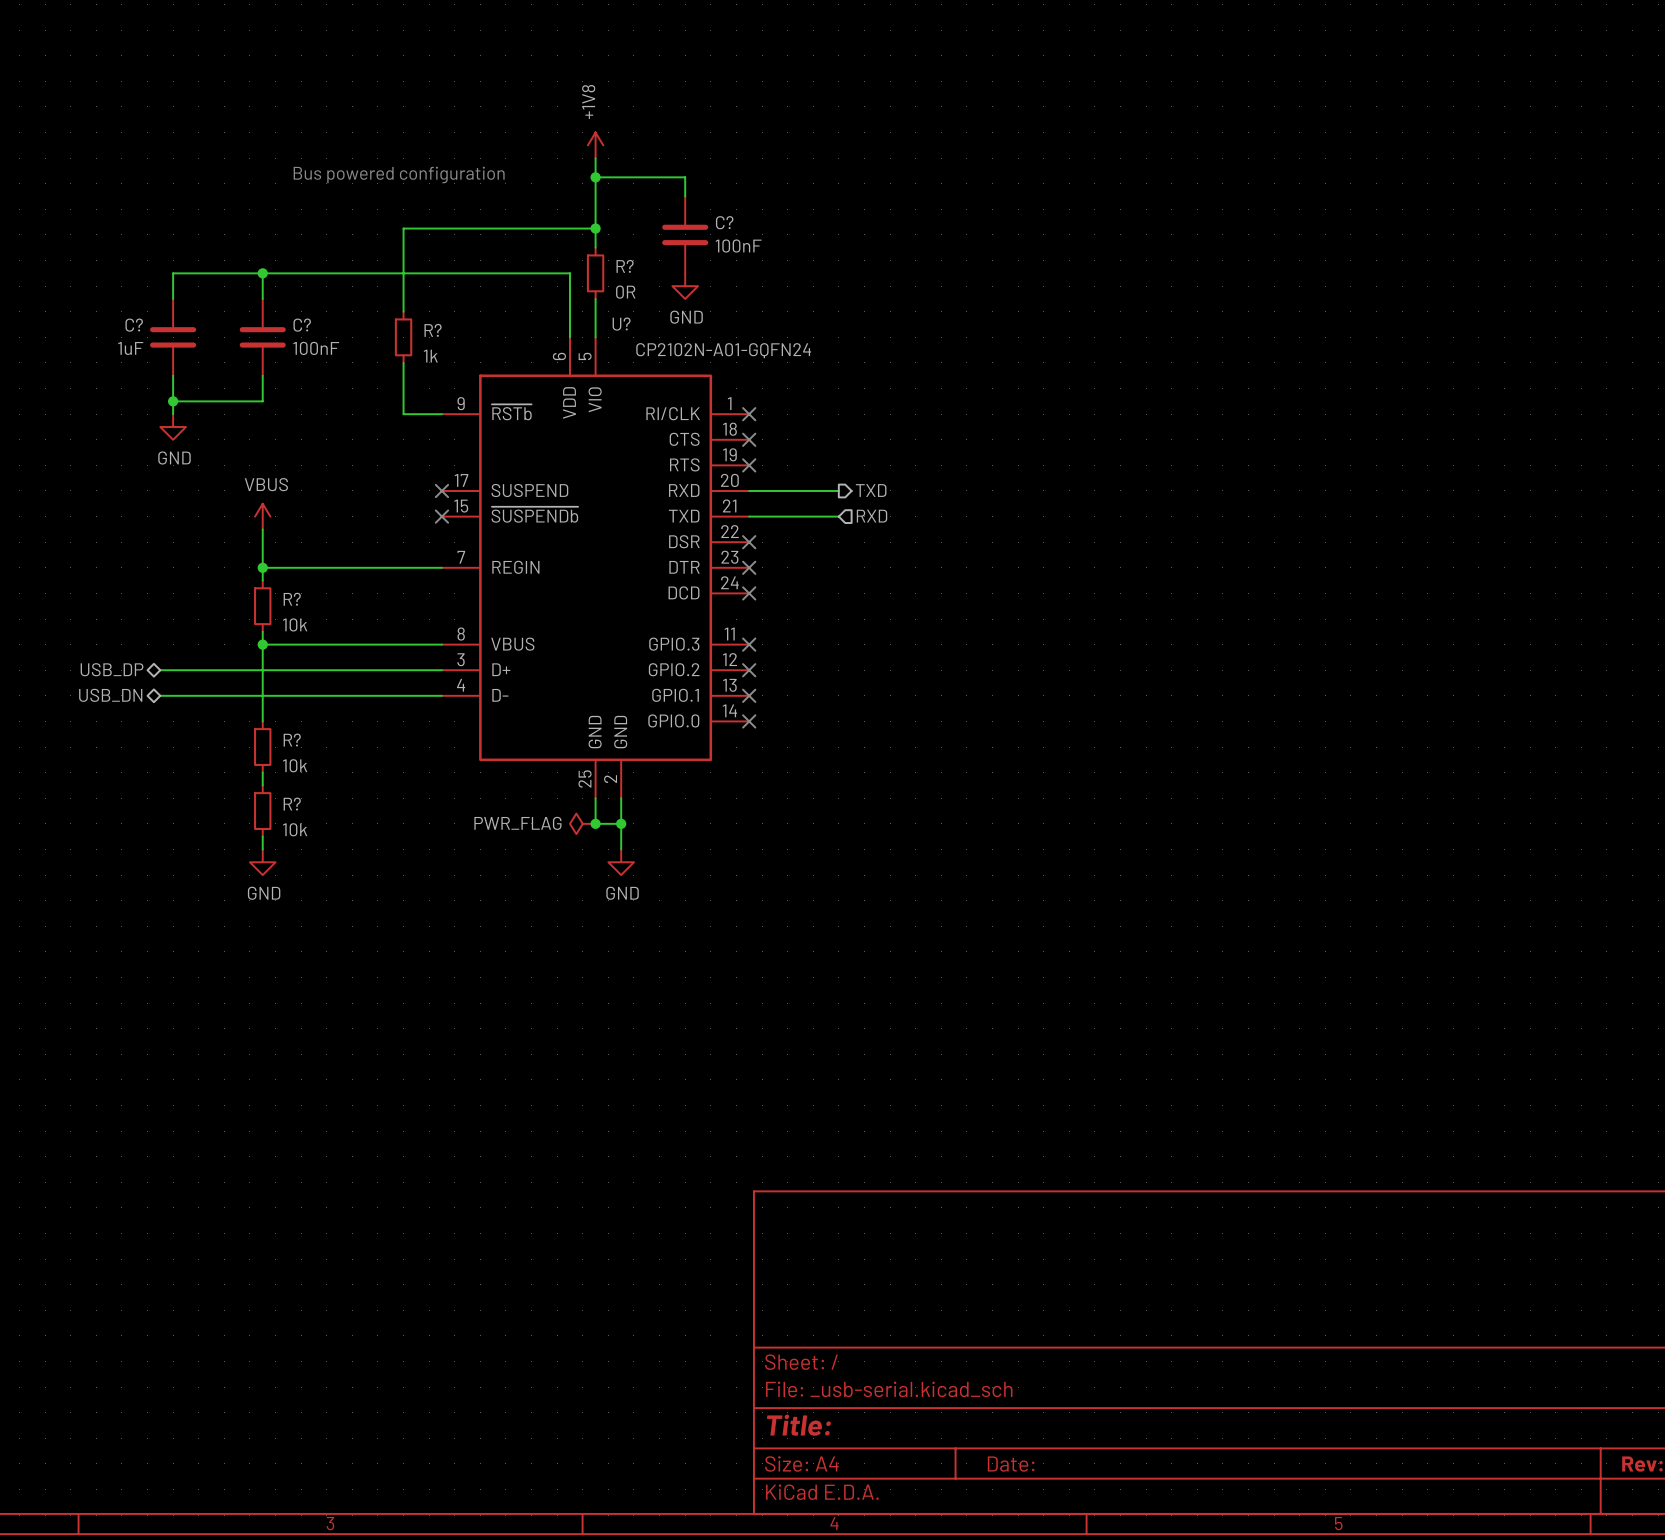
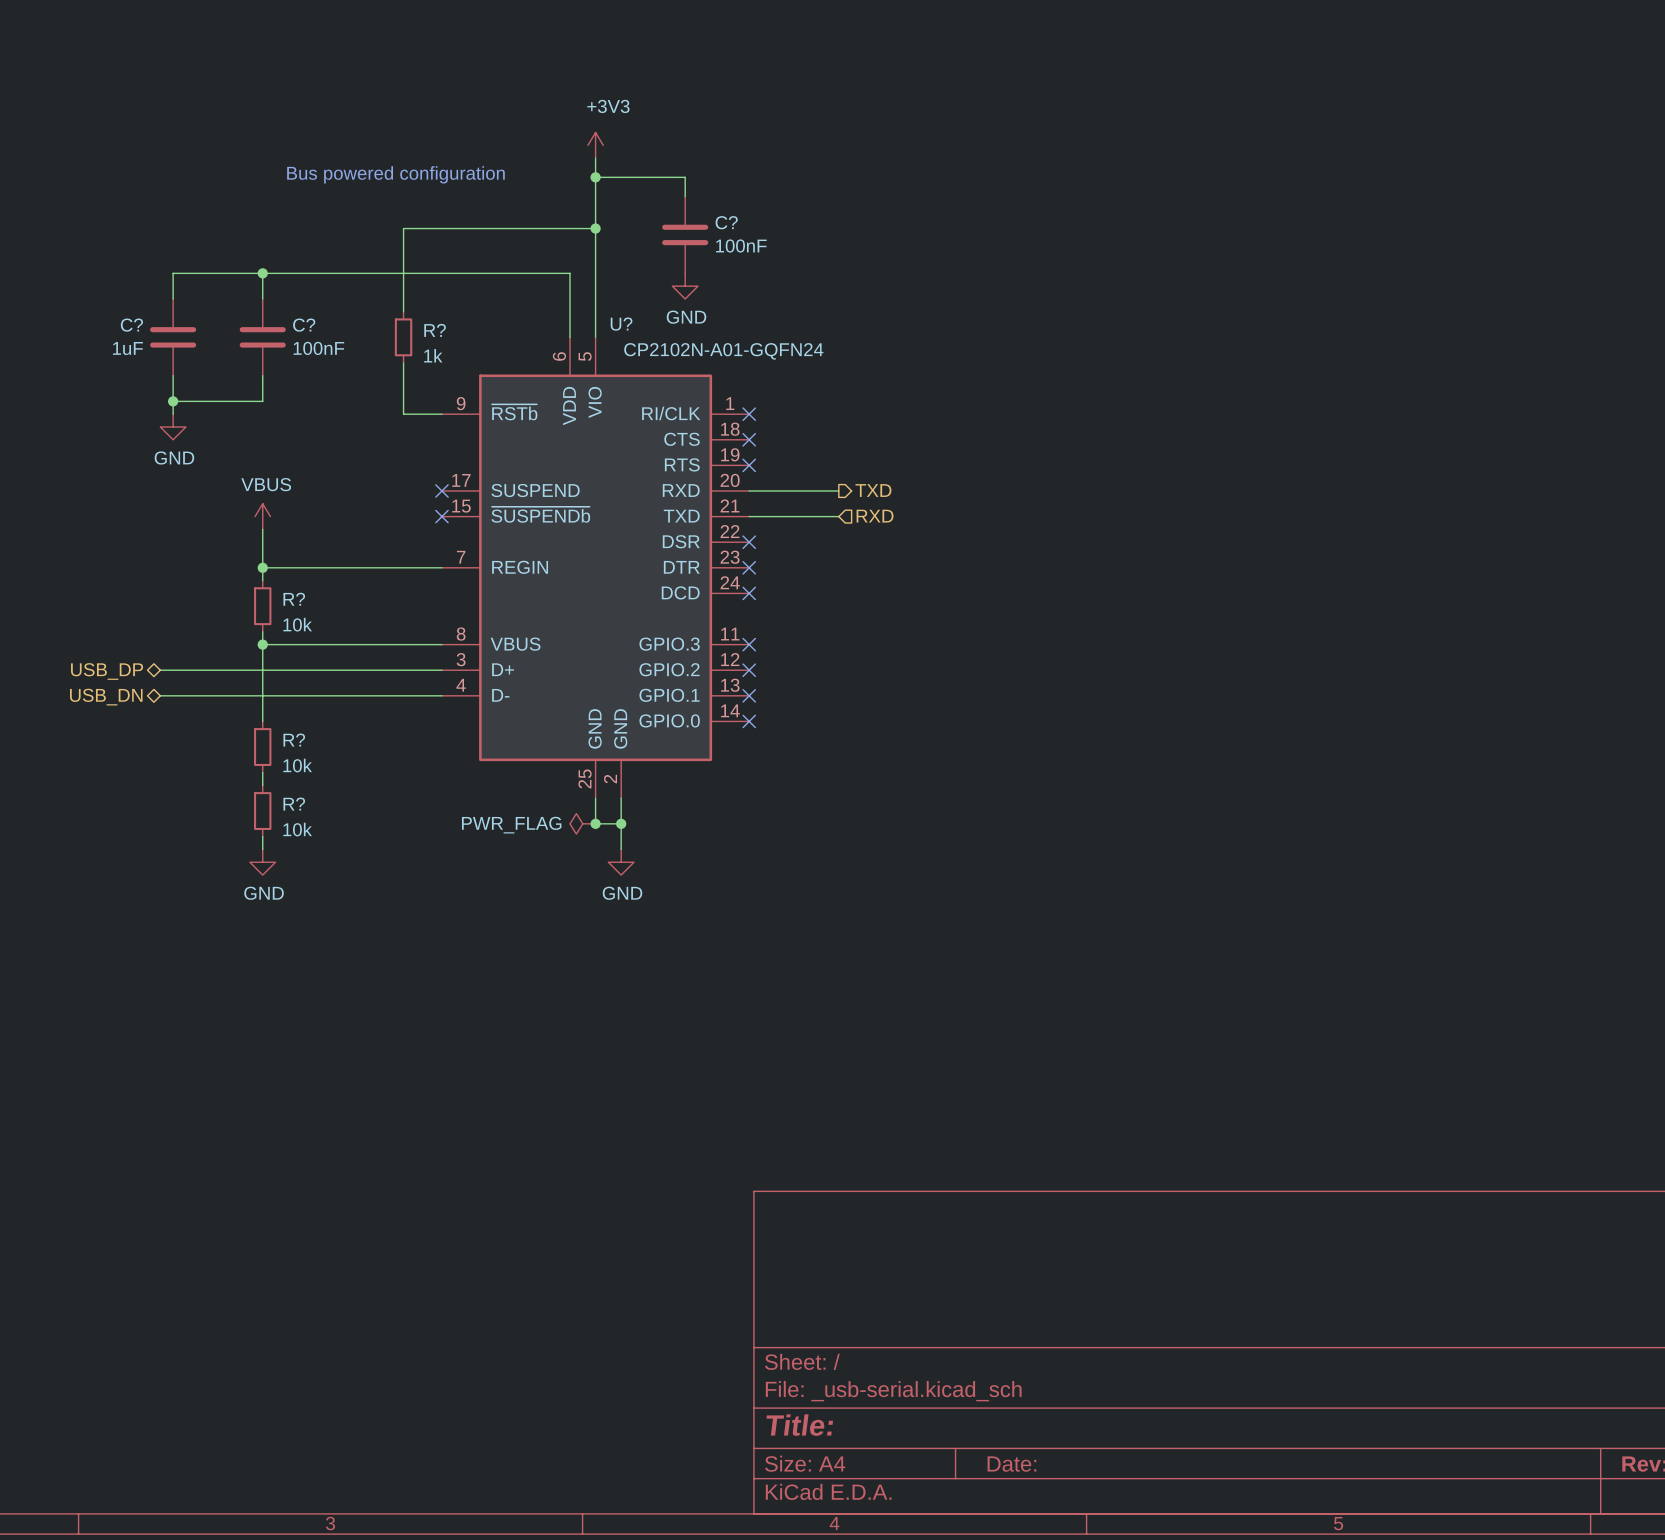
power symbol: +1V8 (595, 145) -> +3V3 (595, 145)
wire: none -> (595, 247) (595, 298)
R?: 0R (595, 273) -> none

